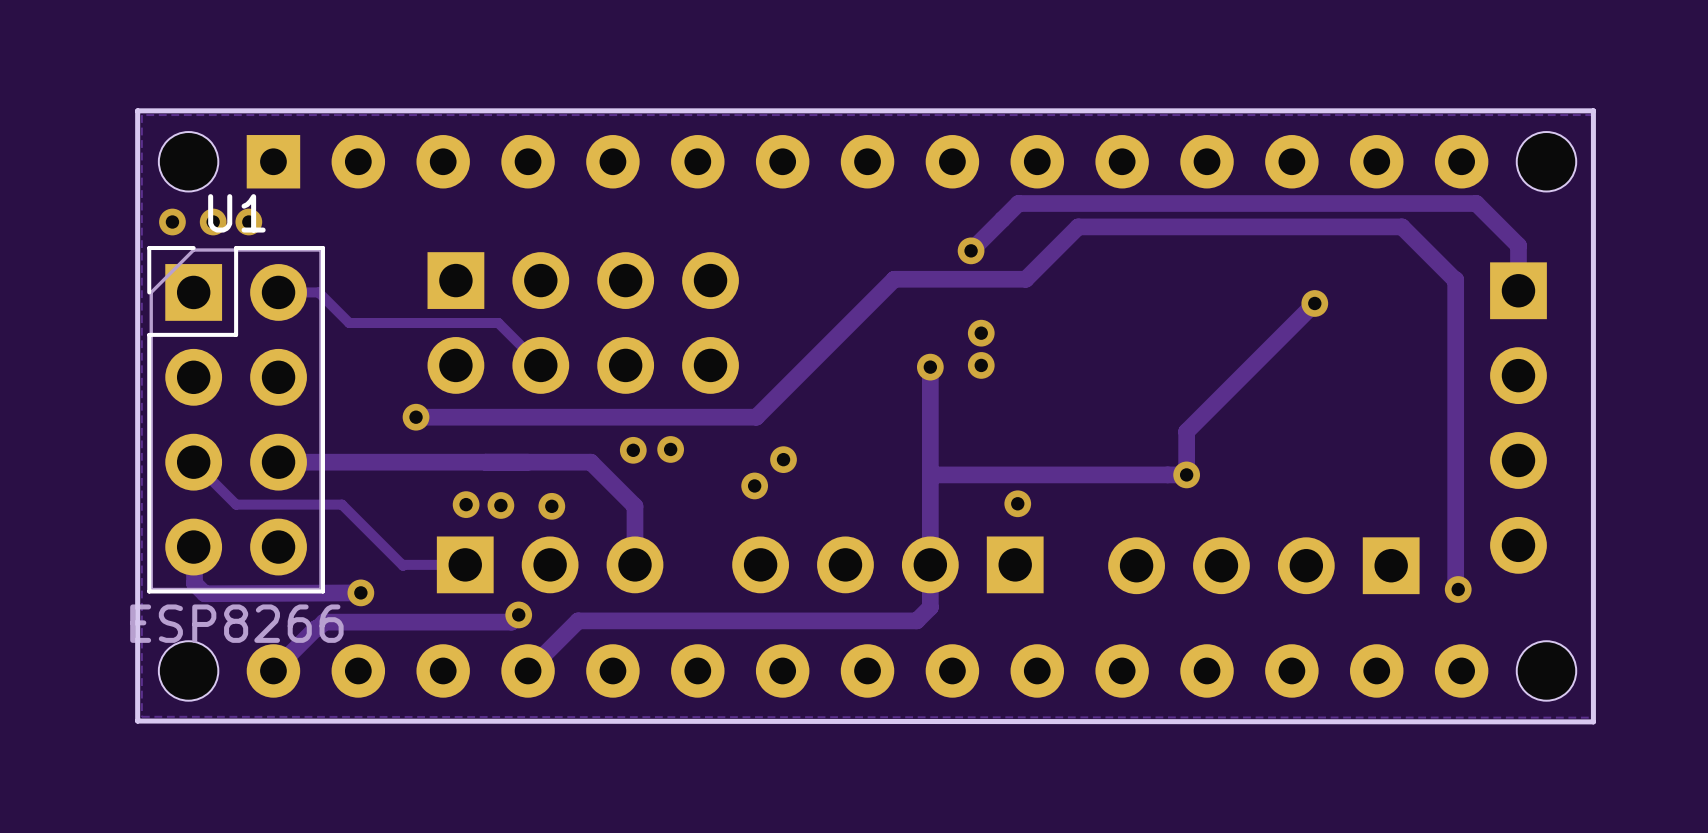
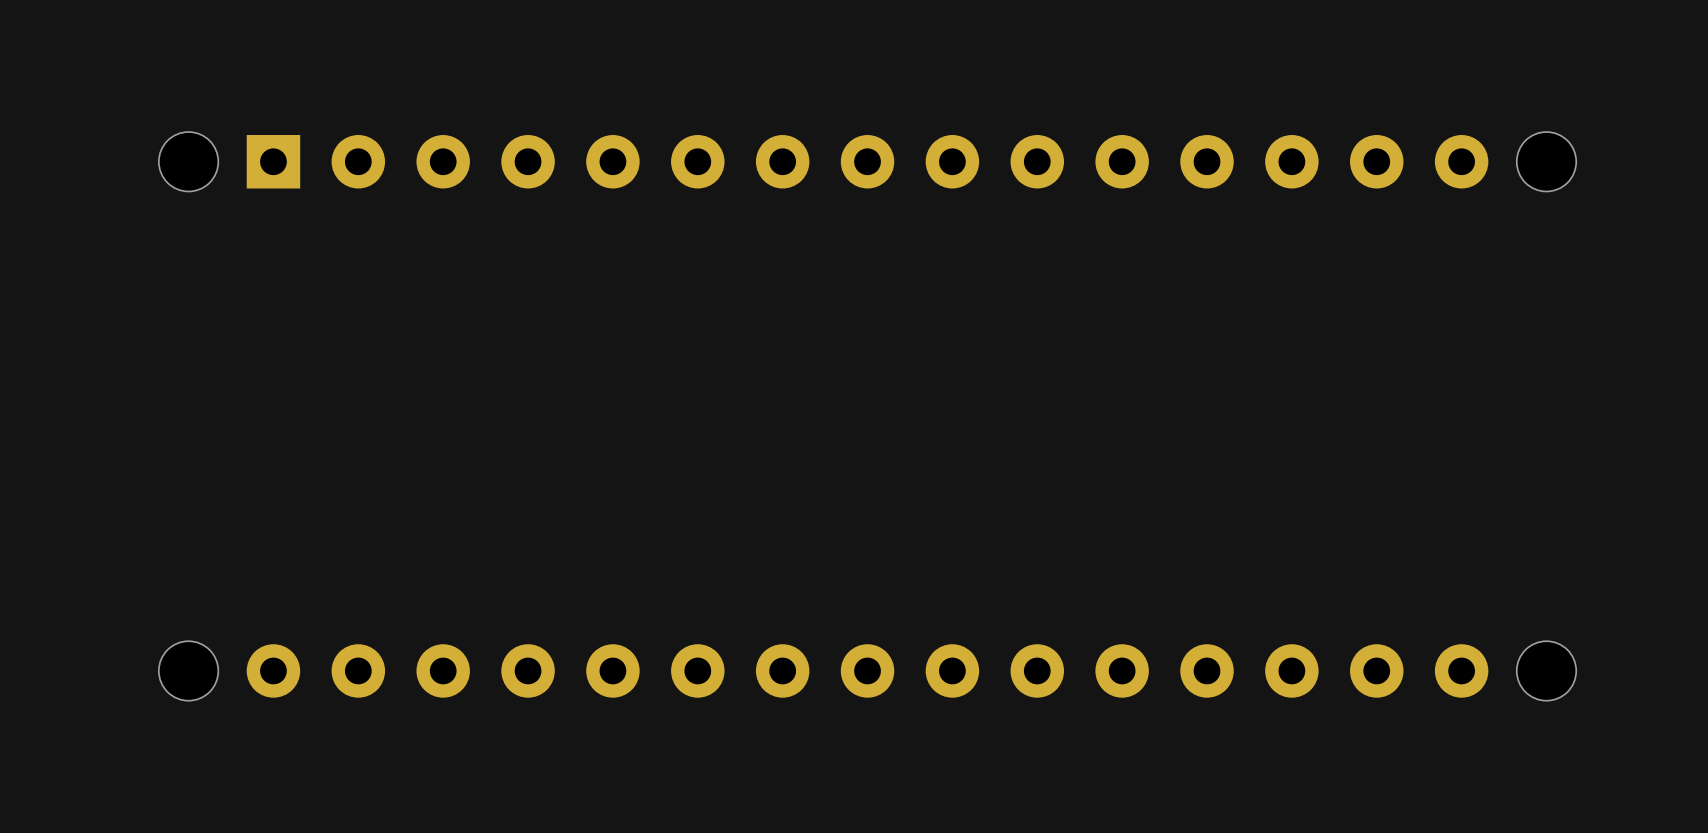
board edge: (1593, 110) (1593, 721) (137, 721) (137, 110) (1593, 110) -> none
zone outline: (1593, 115) (141, 115) (141, 716) (1593, 717) (1593, 115) -> none
via: (172, 222) -> none
via: (213, 222) -> none
via: (248, 222) -> none
track: (971, 250) (1018, 203) (1476, 203) (1518, 245) (1518, 290) -> none
via: (971, 250) -> none
track: (278, 292) (318, 292) (349, 323) (498, 323) (540, 365) -> none
track: (1314, 303) (1186, 431) (1186, 474) (930, 474) -> none
via: (1314, 303) -> none
part: (583, 323) -> none
via: (981, 333) -> none
via: (981, 365) -> none
track: (930, 367) (930, 607) (916, 620) (578, 620) (528, 670) -> none
via: (930, 367) -> none
track: (416, 417) (756, 417) (894, 279) (1025, 279) (1078, 226) (1402, 226) (1455, 279) (1455, 591) -> none
via: (416, 417) -> none
part: (1518, 418) -> none
U1: ESP8266 (236, 419) -> none
via: (670, 449) -> none
via: (633, 450) -> none
via: (783, 459) -> none
track: (193, 462) (236, 504) (341, 504) (403, 565) (465, 564) -> none
track: (278, 462) (590, 462) (634, 506) (634, 564) -> none
via: (1186, 474) -> none
via: (754, 485) -> none
via: (1017, 503) -> none
via: (466, 504) -> none
via: (500, 505) -> none
via: (551, 506) -> none
track: (193, 547) (194, 583) (204, 593) (360, 592) -> none
part: (550, 564) -> none
part: (887, 564) -> none
part: (1263, 565) -> none
via: (1458, 589) -> none
via: (360, 592) -> none
track: (518, 614) (511, 622) (323, 622) (273, 670) -> none
via: (518, 614) -> none

